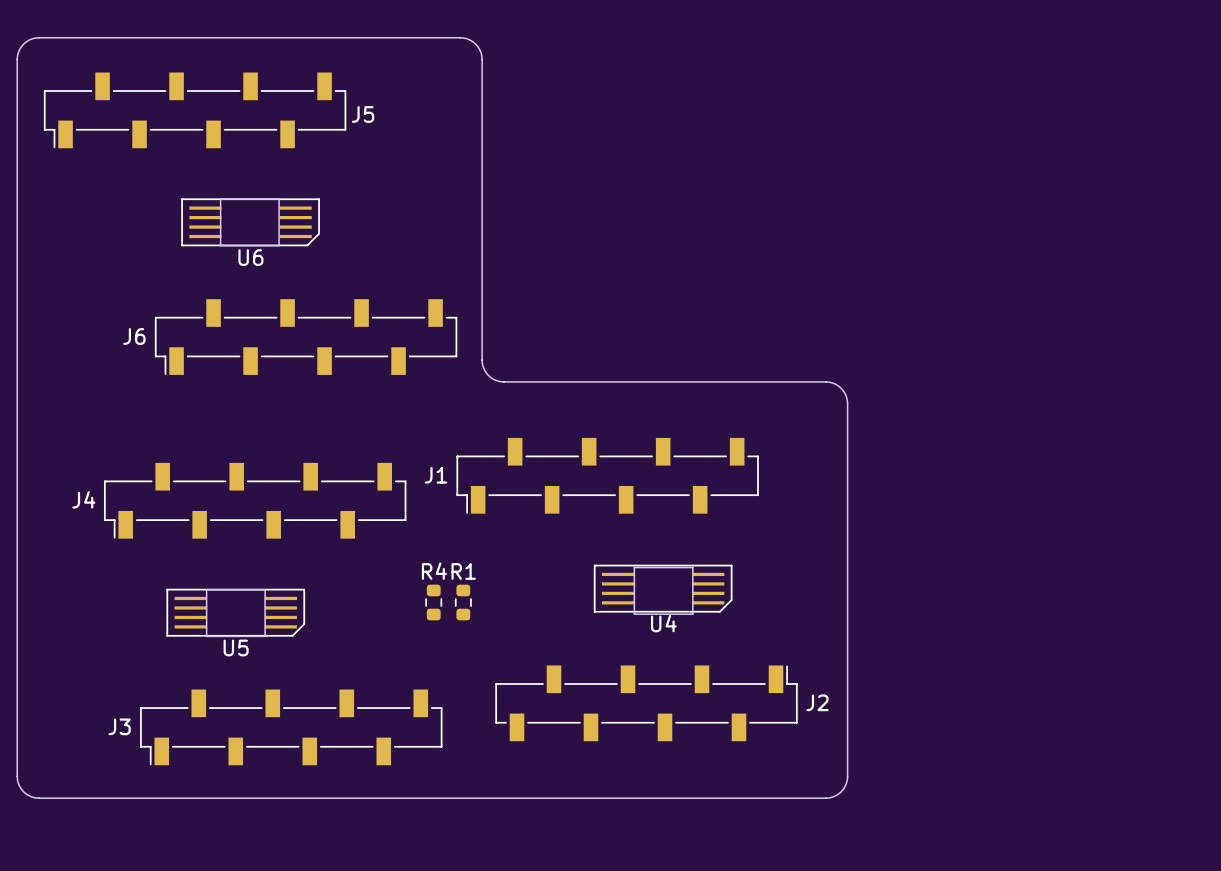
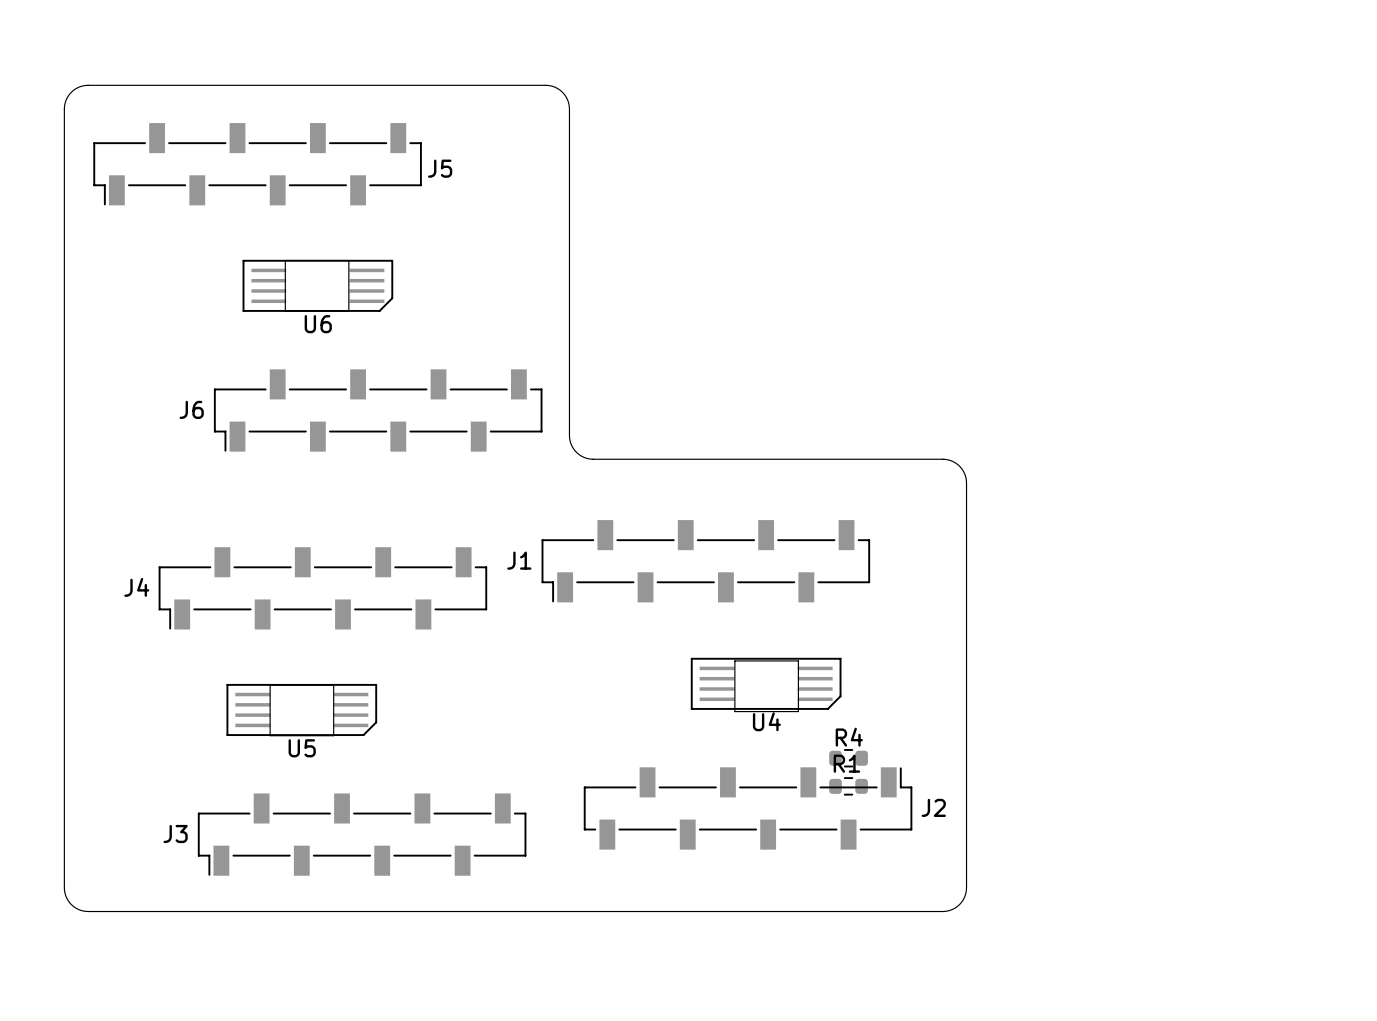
R4 rotation: 0° (433, 602) -> 90° clockwise (848, 758)
R4 position: (433, 602) -> (848, 758)
R1 rotation: 0° (463, 602) -> 90° clockwise (848, 786)
R1 position: (463, 602) -> (848, 786)

